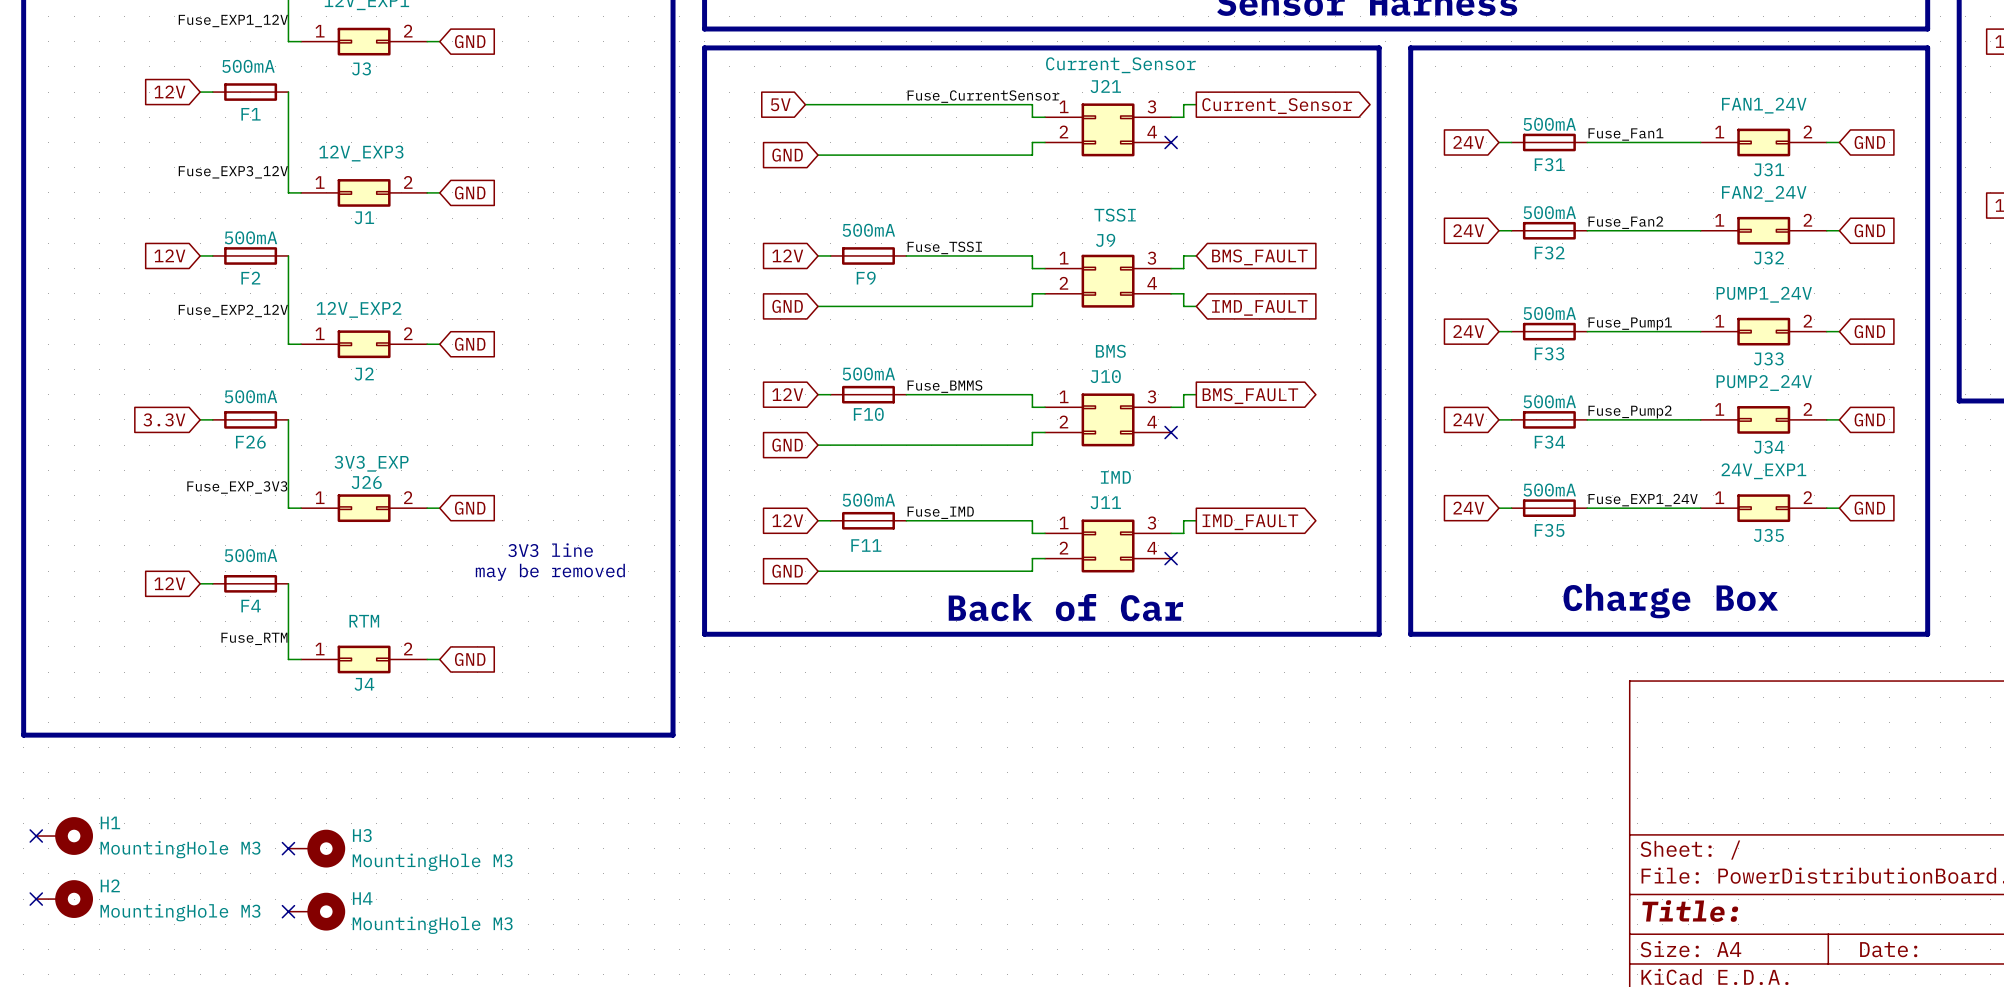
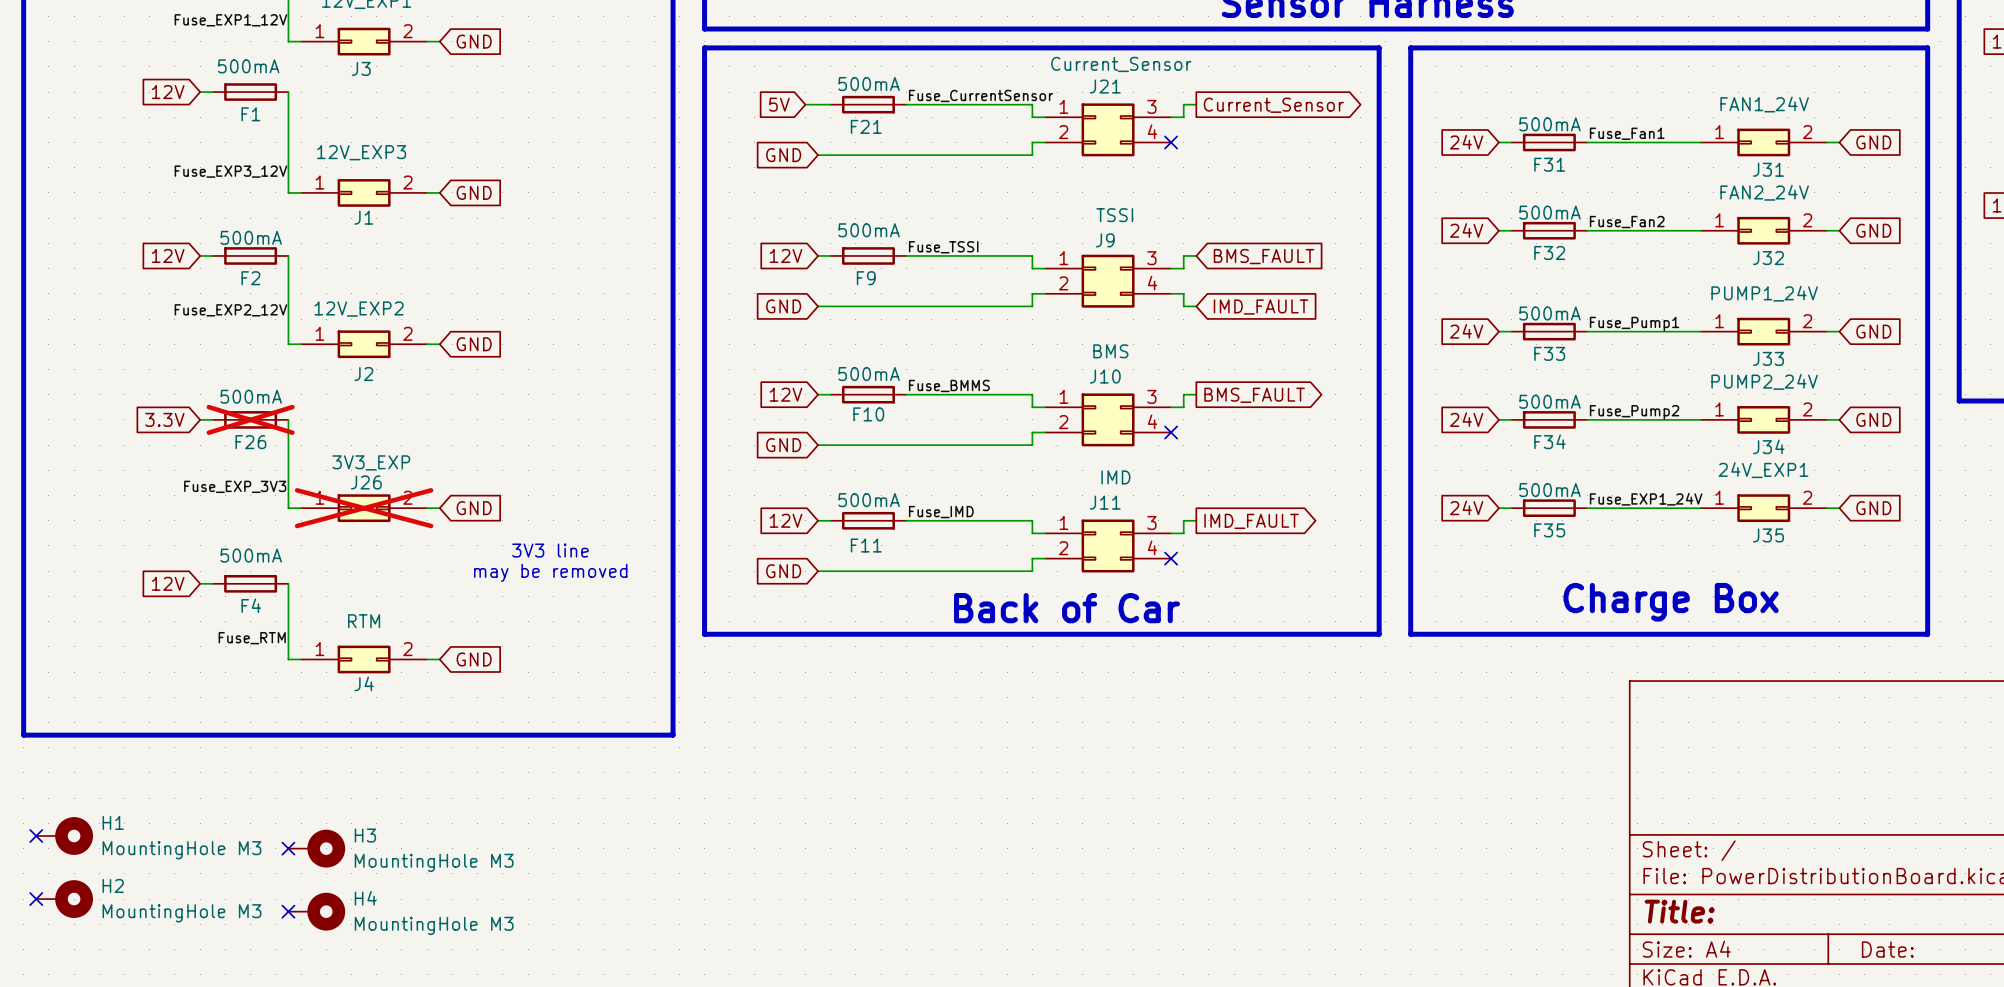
F21: none -> 500mA (868, 104)
F26 do-not-place cross: none -> (250, 419)
J26 do-not-place cross: none -> (364, 508)

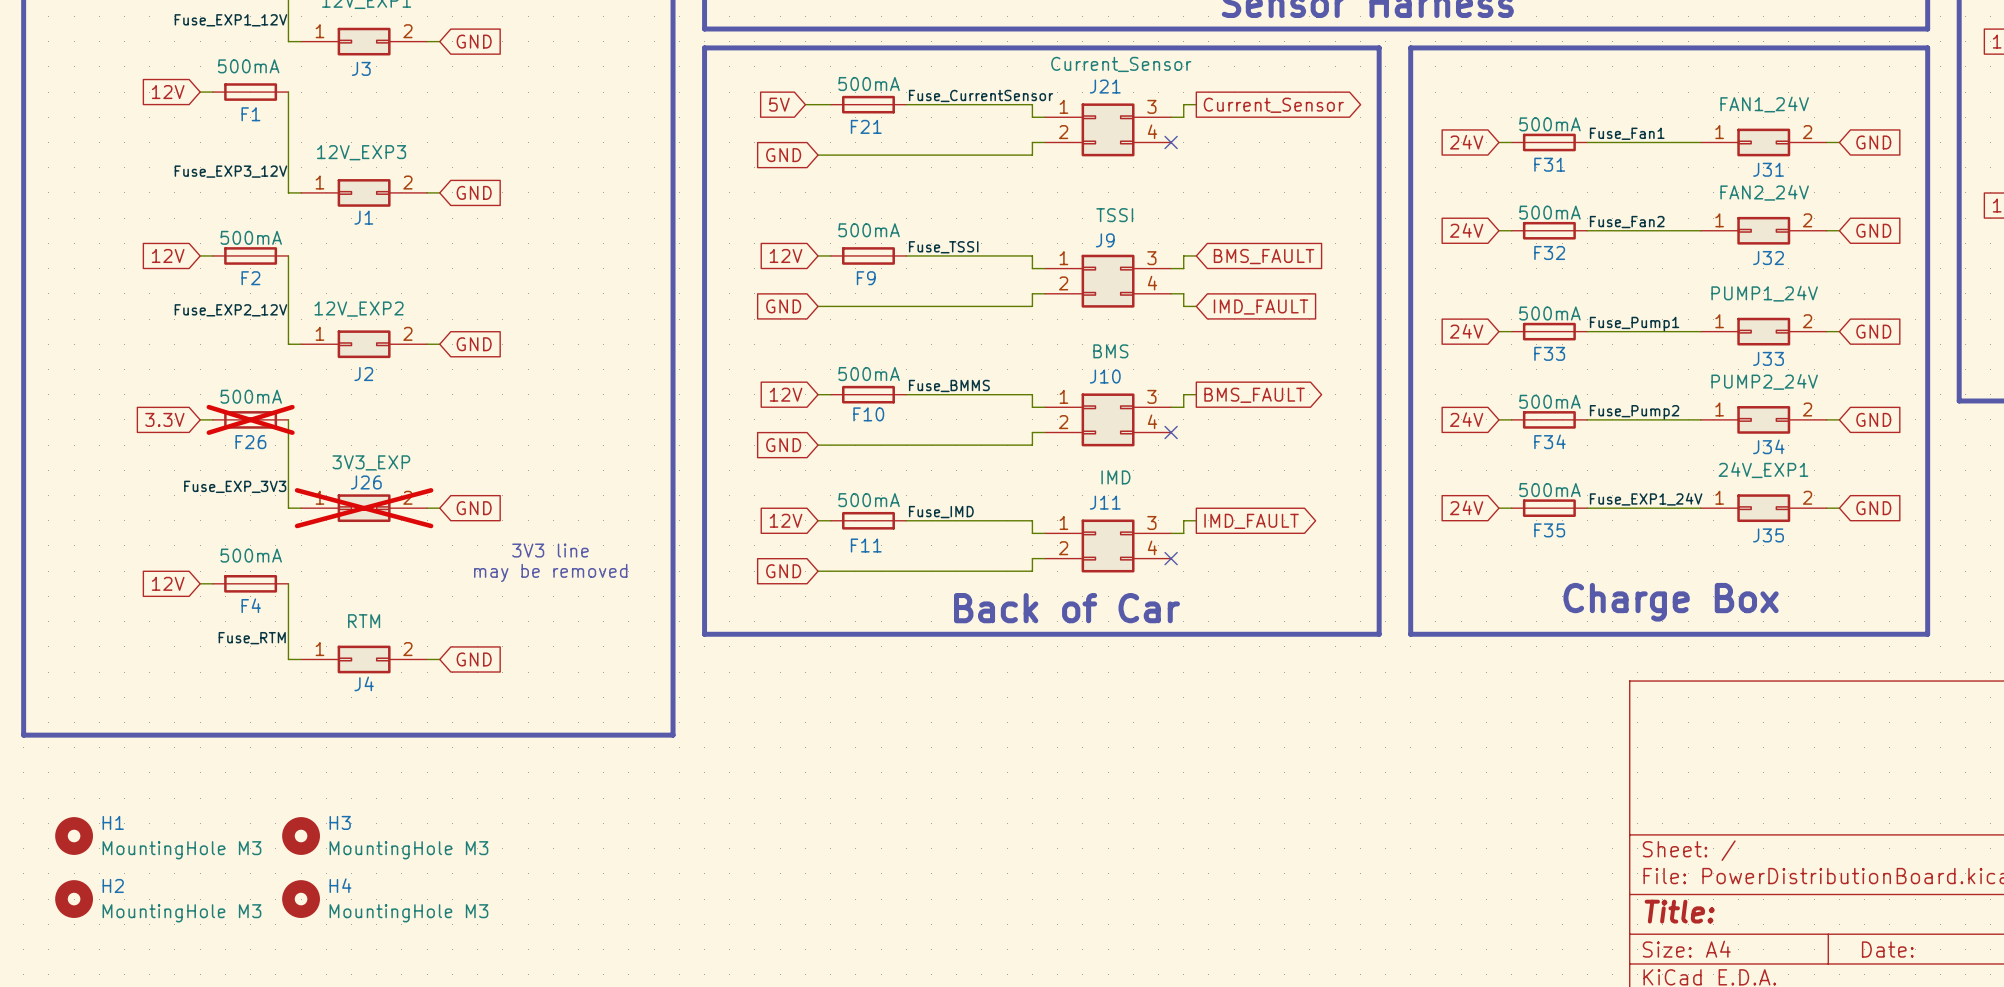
H1 symbol: [36, 817, 94, 855] -> [55, 817, 94, 855]
H3 symbol: [288, 829, 346, 868] -> [282, 817, 320, 855]
no-connect mark: (36, 836) -> none
no-connect mark: (288, 848) -> none
H2 symbol: [36, 880, 94, 918] -> [55, 880, 94, 918]
H4 symbol: [288, 892, 346, 931] -> [282, 880, 320, 918]
no-connect mark: (36, 899) -> none
no-connect mark: (288, 911) -> none

